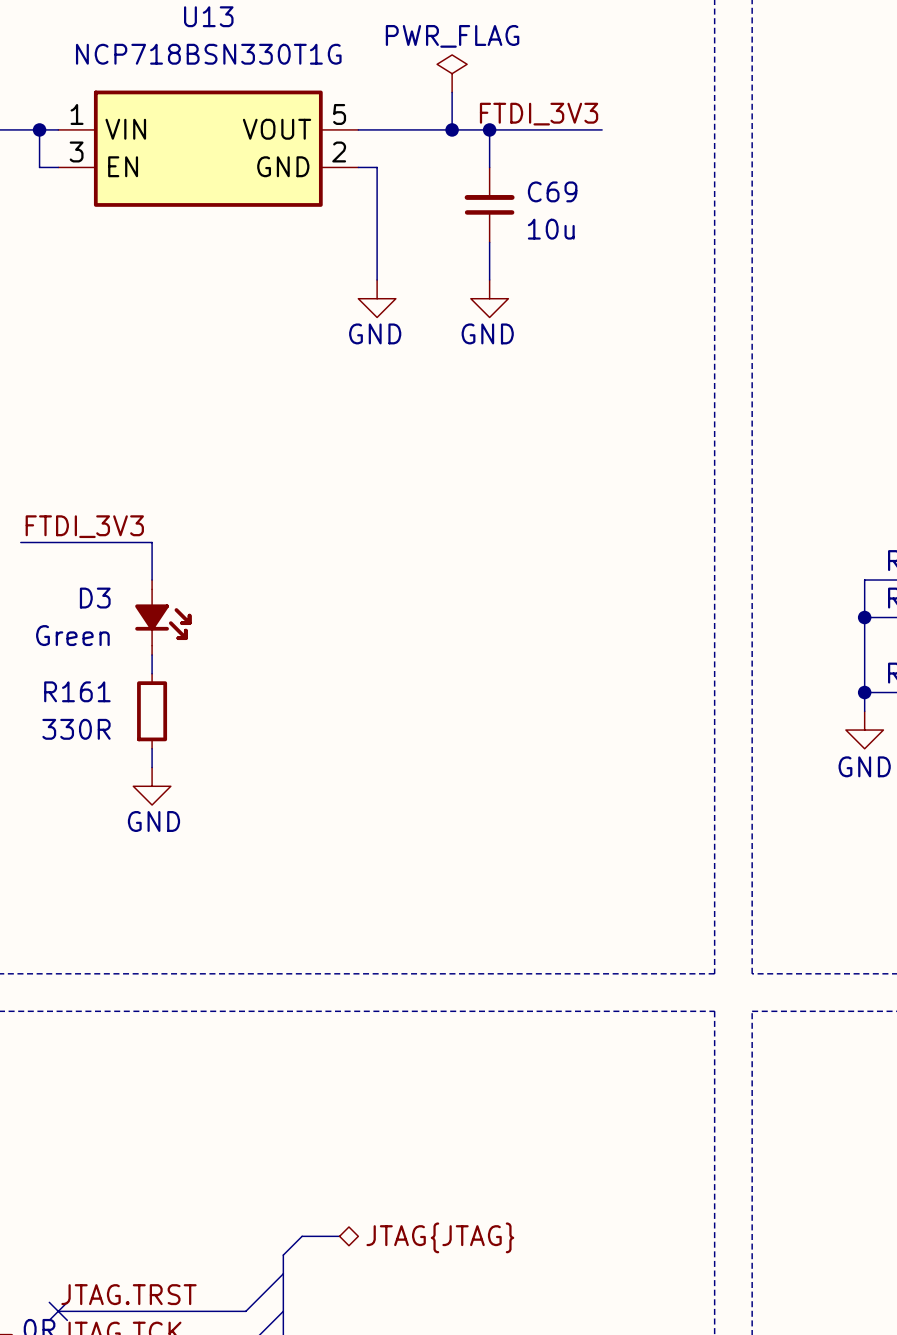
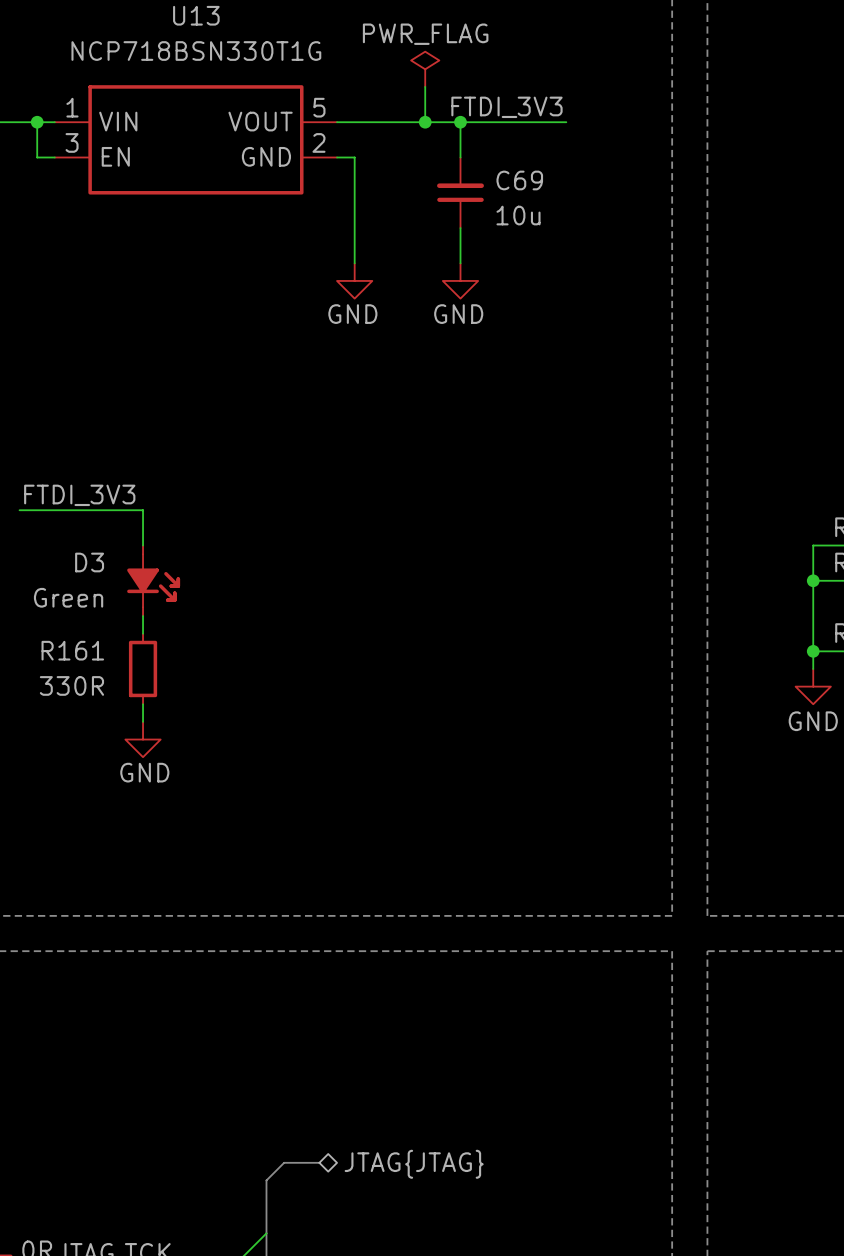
wire: (283, 1273) (245, 1311) (58, 1311) -> none
label: JTAG.TRST (128, 1294) -> none
no-connect mark: (58, 1311) -> none

